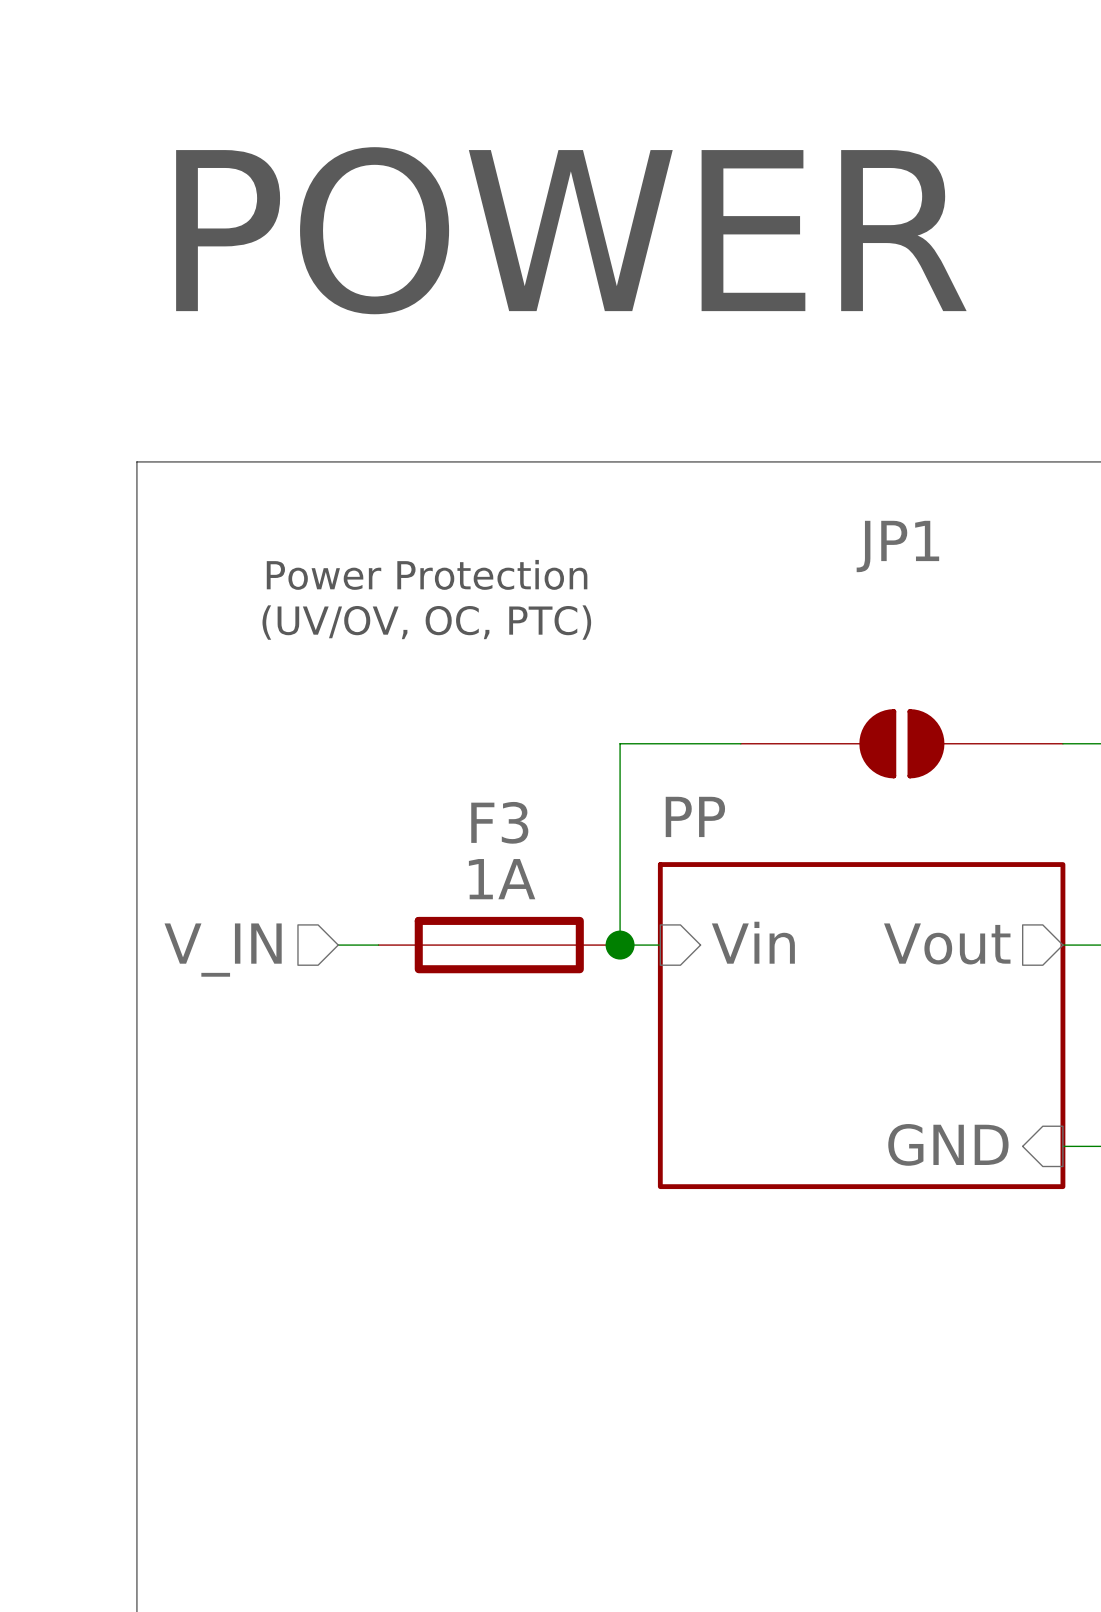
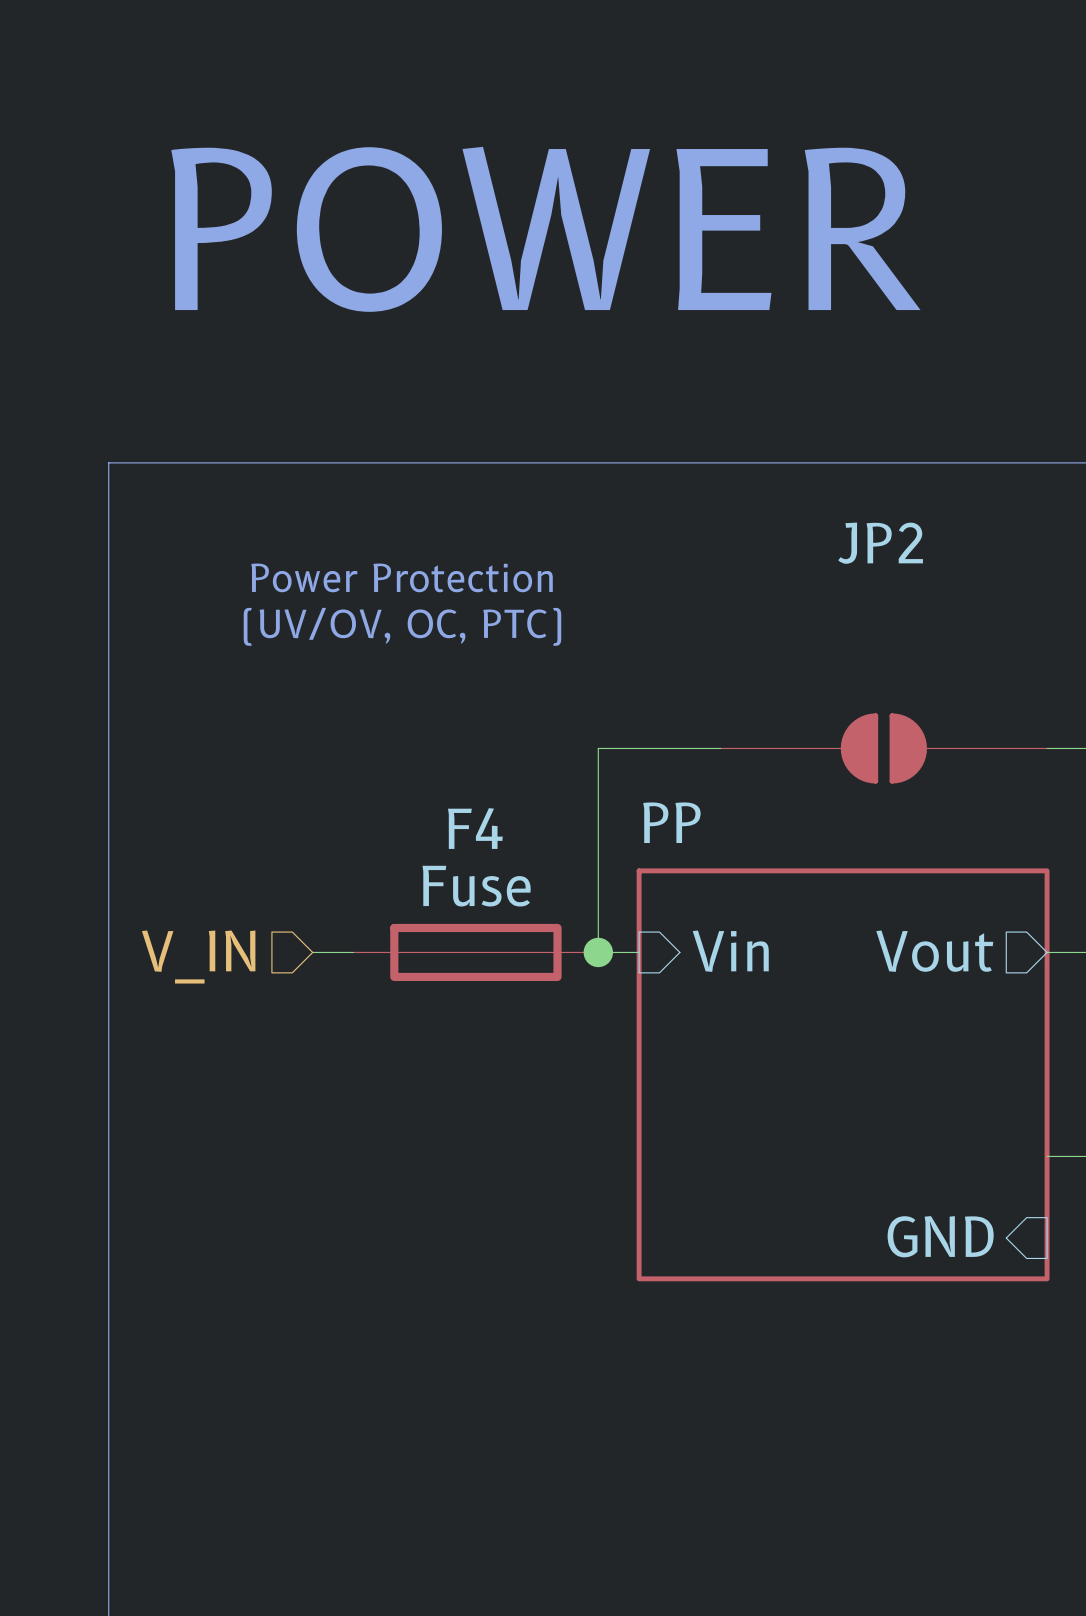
JP1 name: JP1 (897, 546) -> JP2 (880, 543)
F3 name: F3 (499, 822) -> F4 (475, 828)
F3 value: 1A (502, 879) -> Fuse (476, 886)
sheet PP: (861, 1025) -> none
sheet PP: none -> (843, 1074)
sheet pin position: GND (948, 1144) -> GND (940, 1236)

